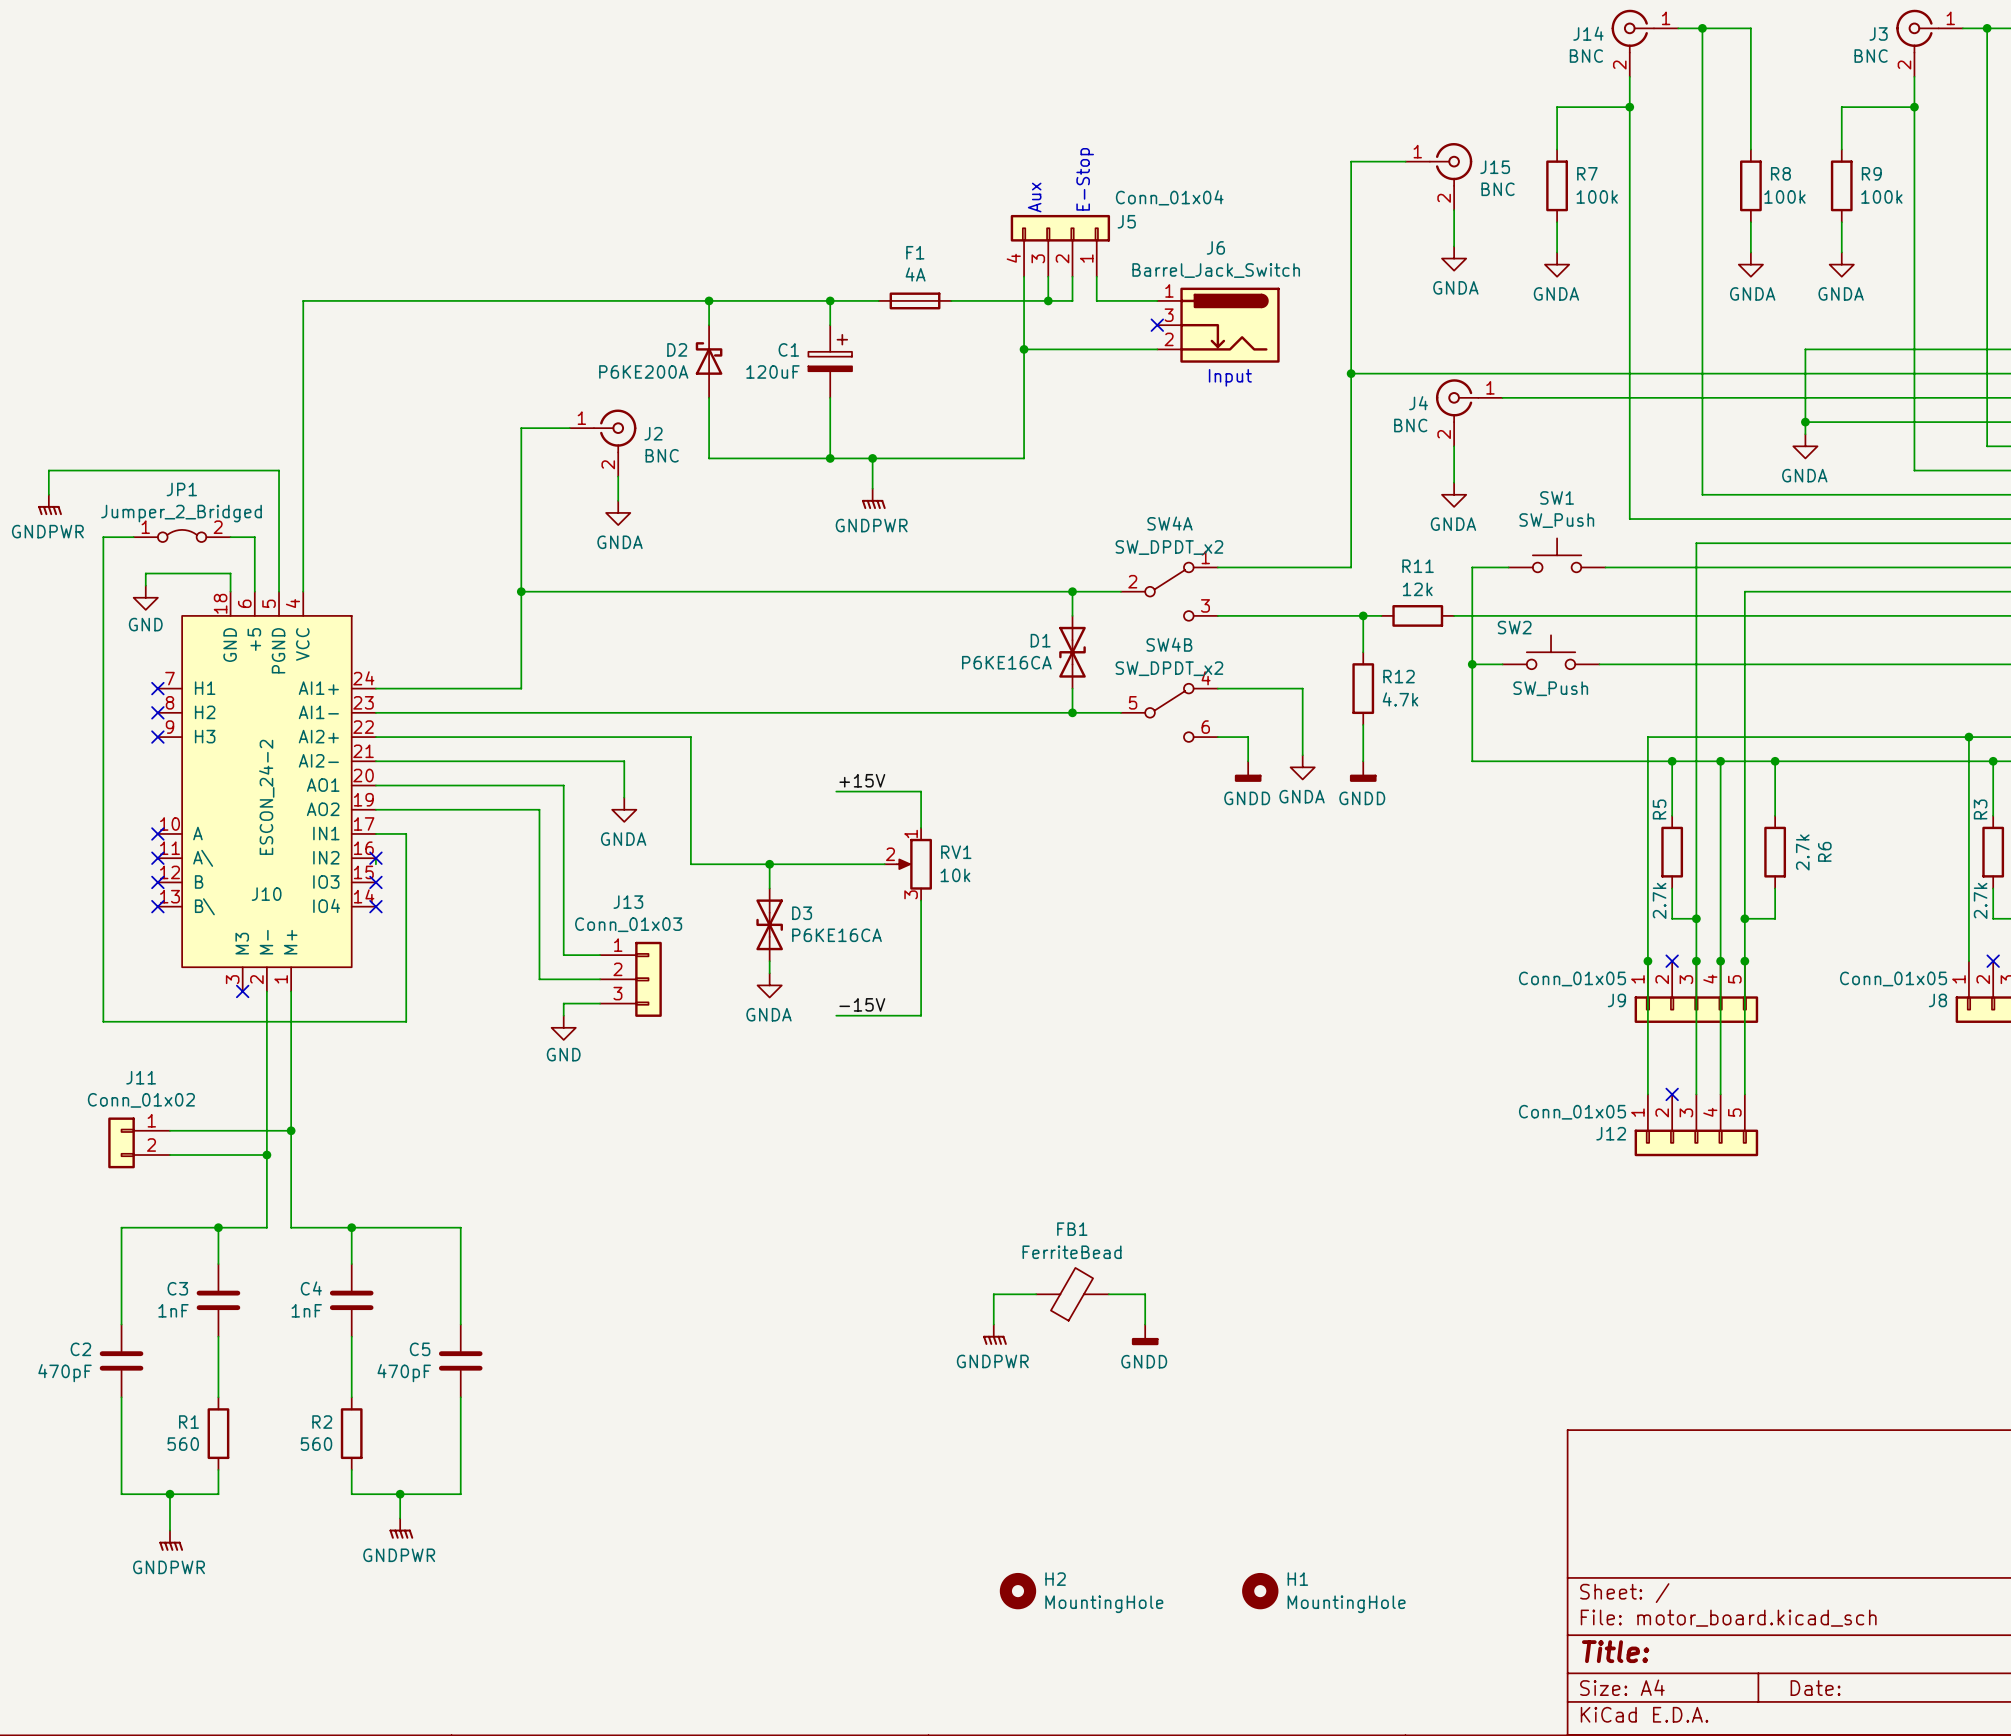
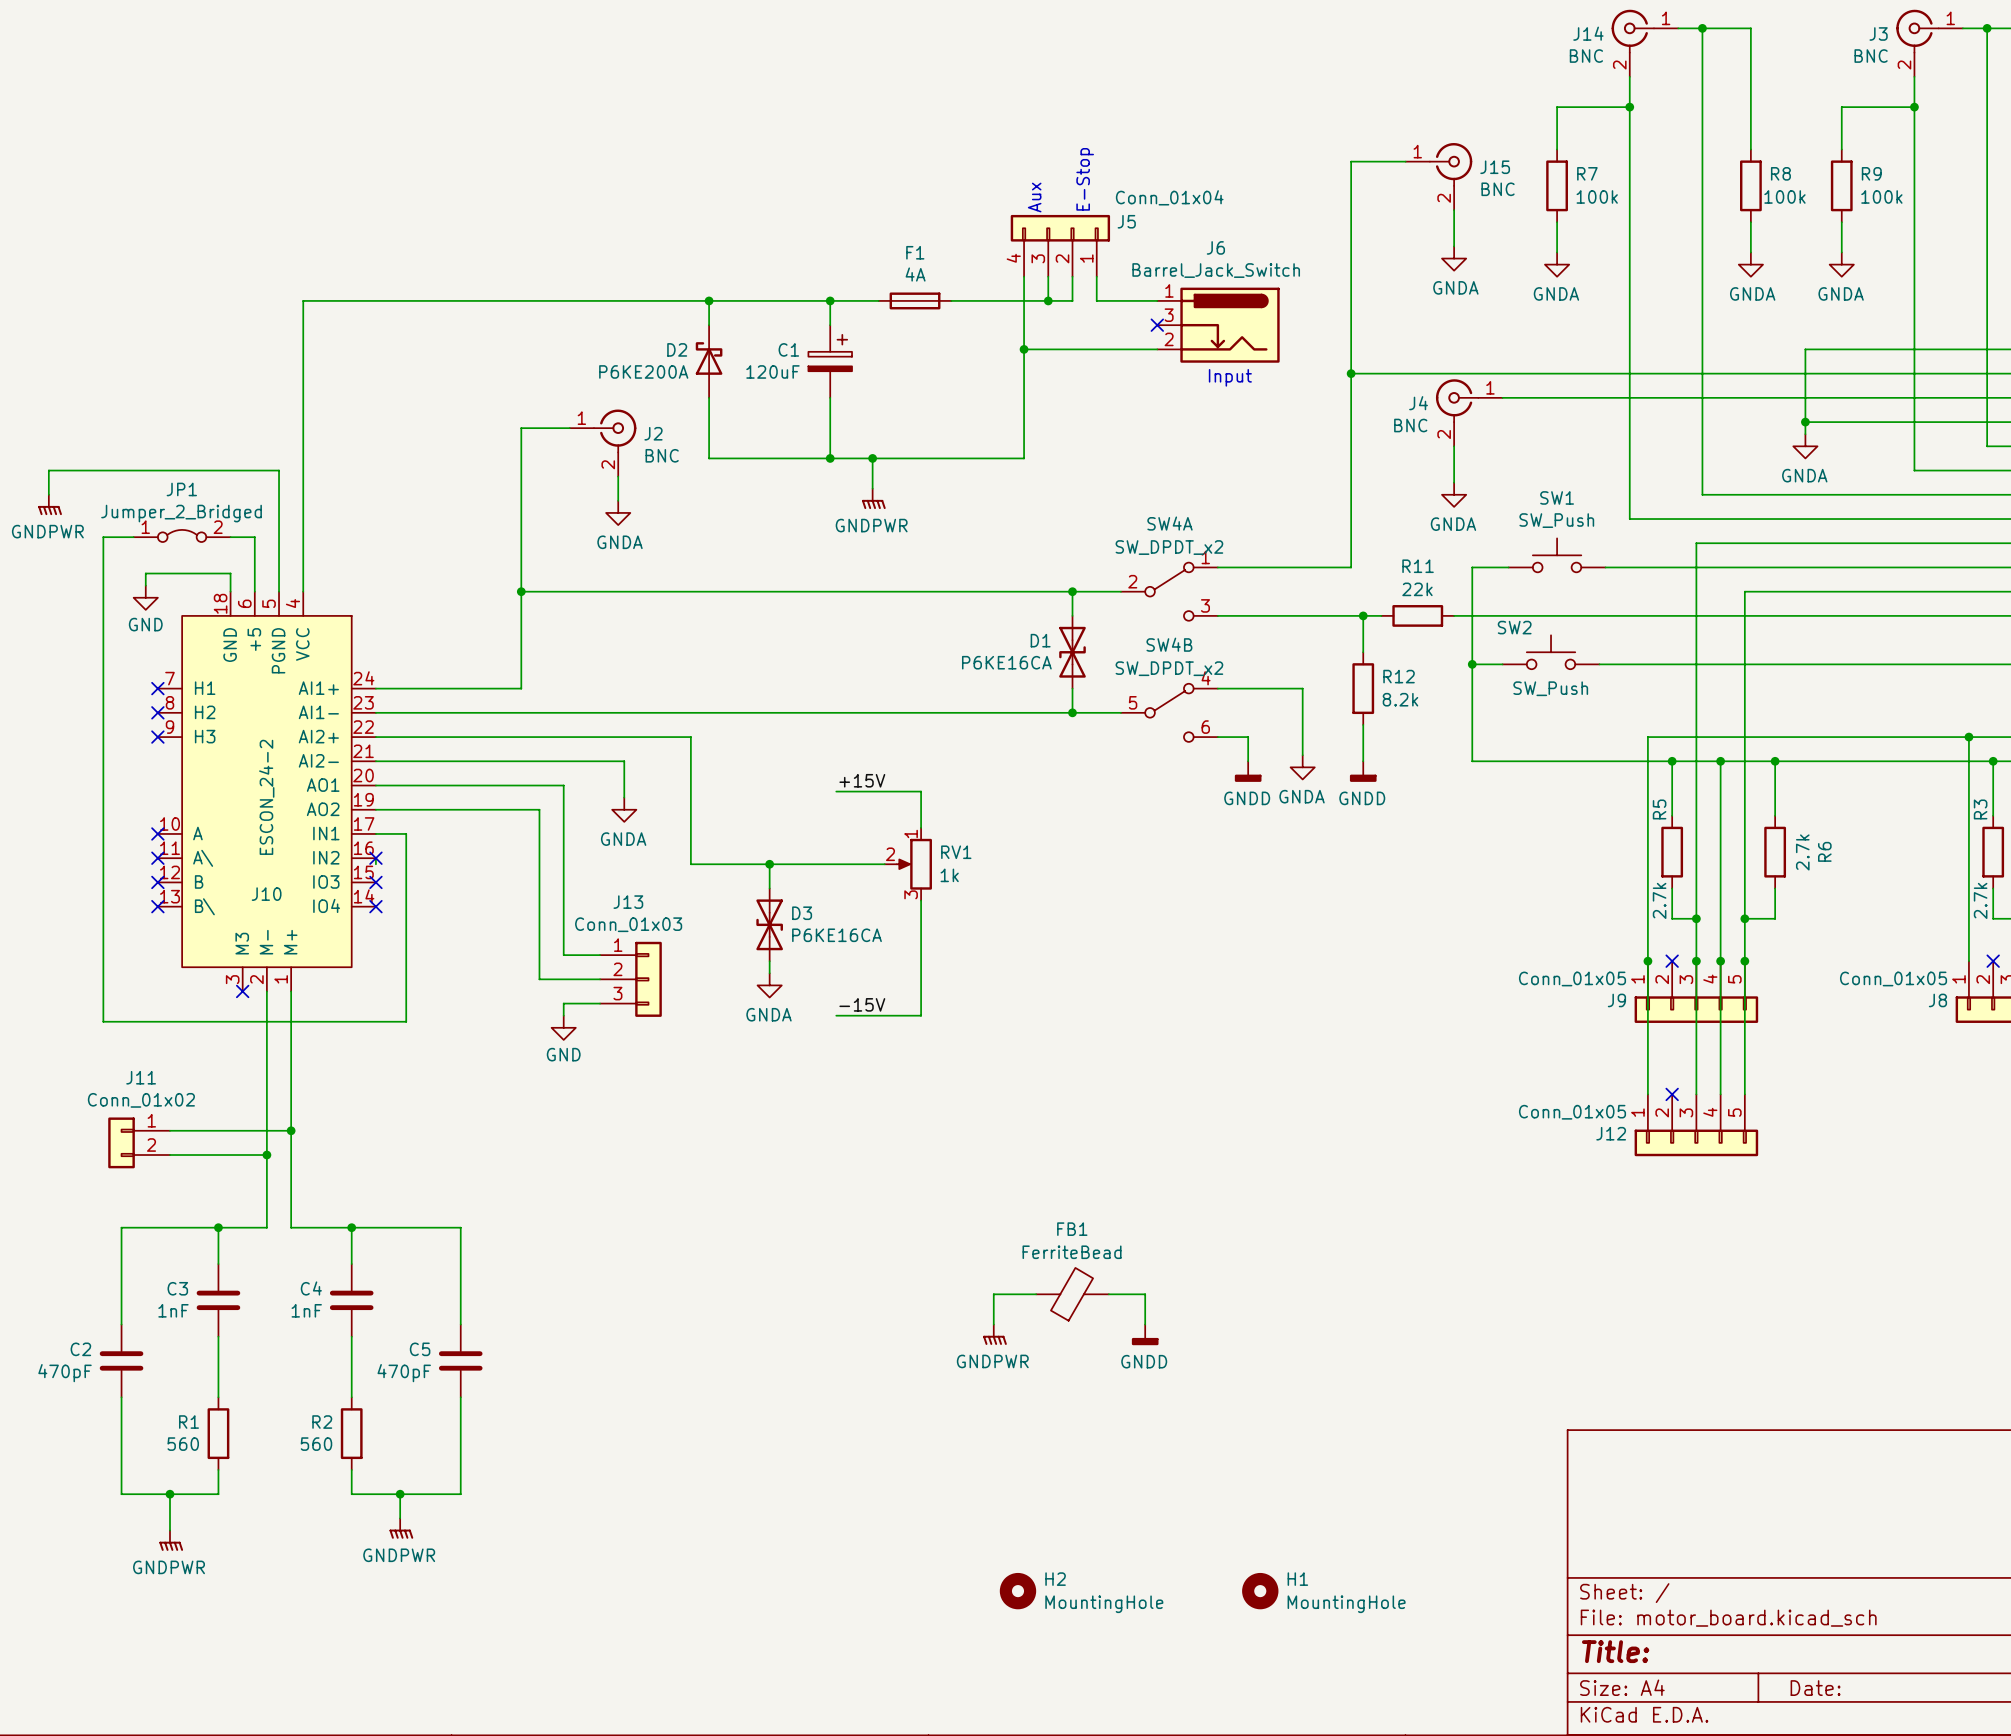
R11 value: 12k (1417, 589) -> 22k (1417, 589)
R12 value: 4.7k (1400, 699) -> 8.2k (1400, 699)
RV1 value: 10k (955, 875) -> 1k (949, 875)

